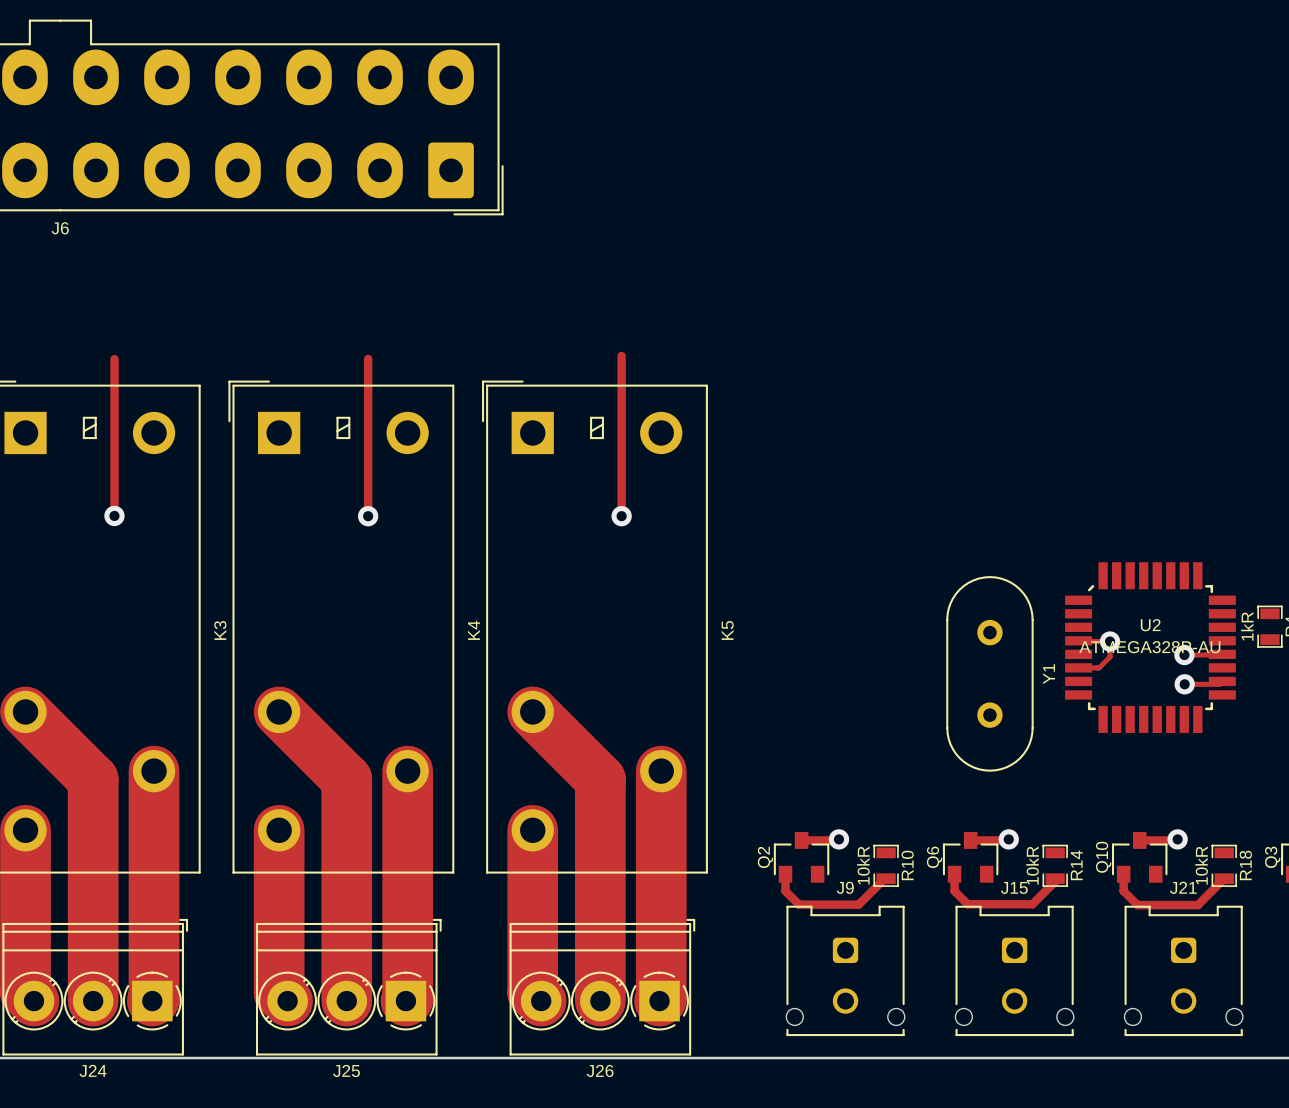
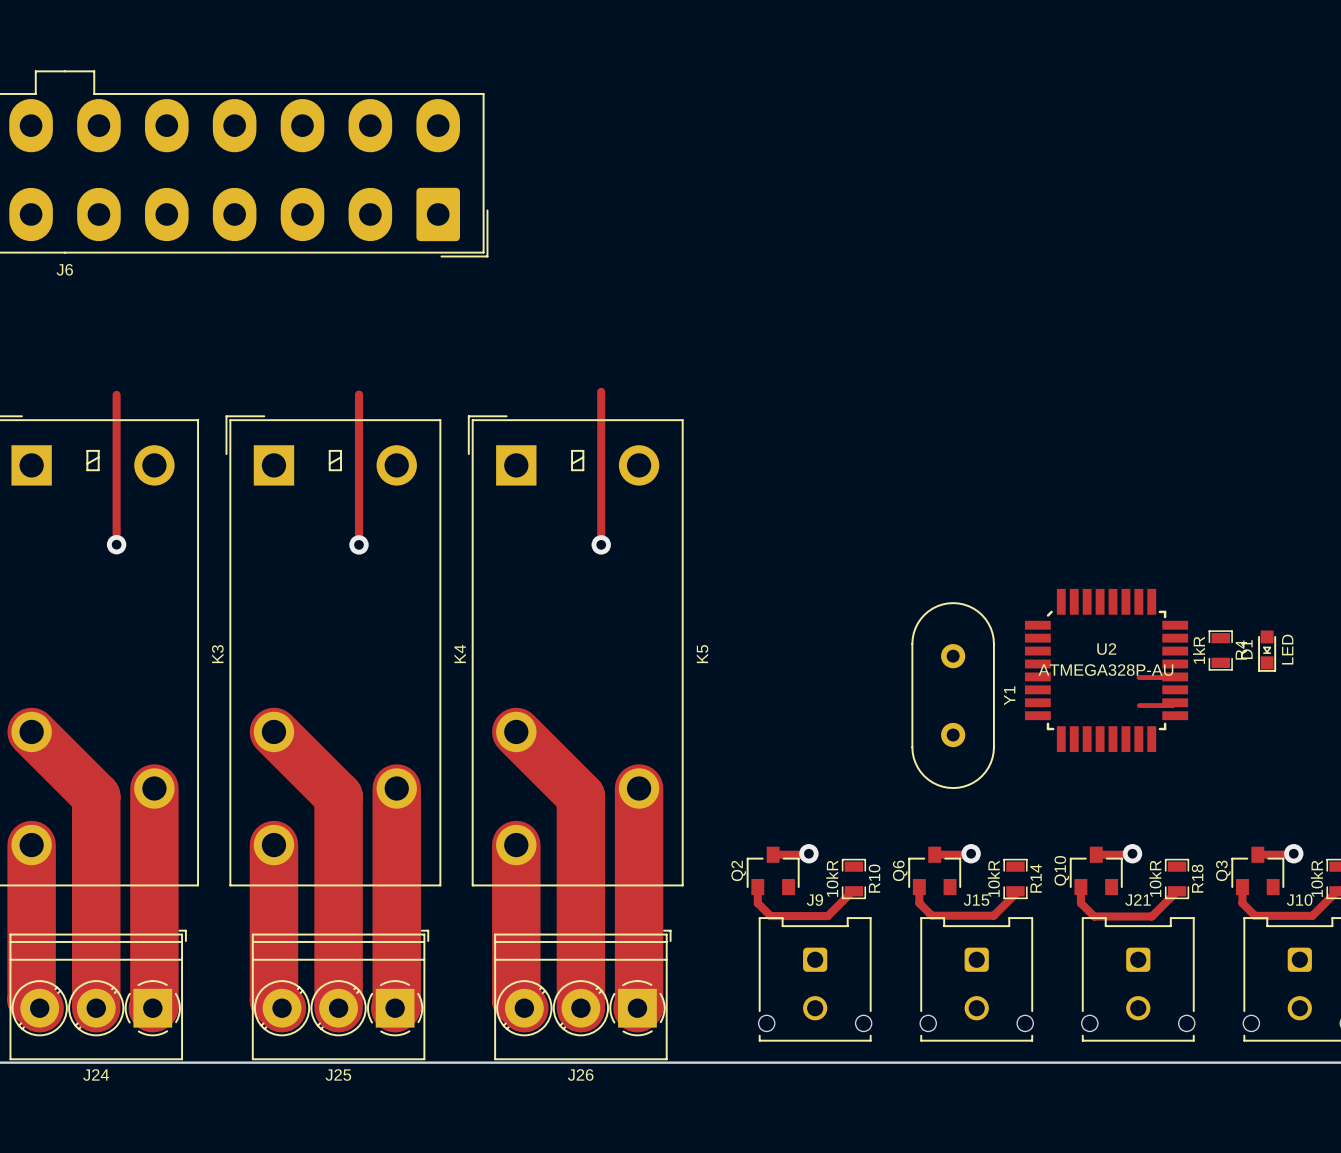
track: (1078, 640) (1110, 641) (1110, 656) (1099, 667) (1078, 667) -> none
via: (1110, 641) -> none
via: (1184, 655) -> none
via: (1184, 684) -> none

